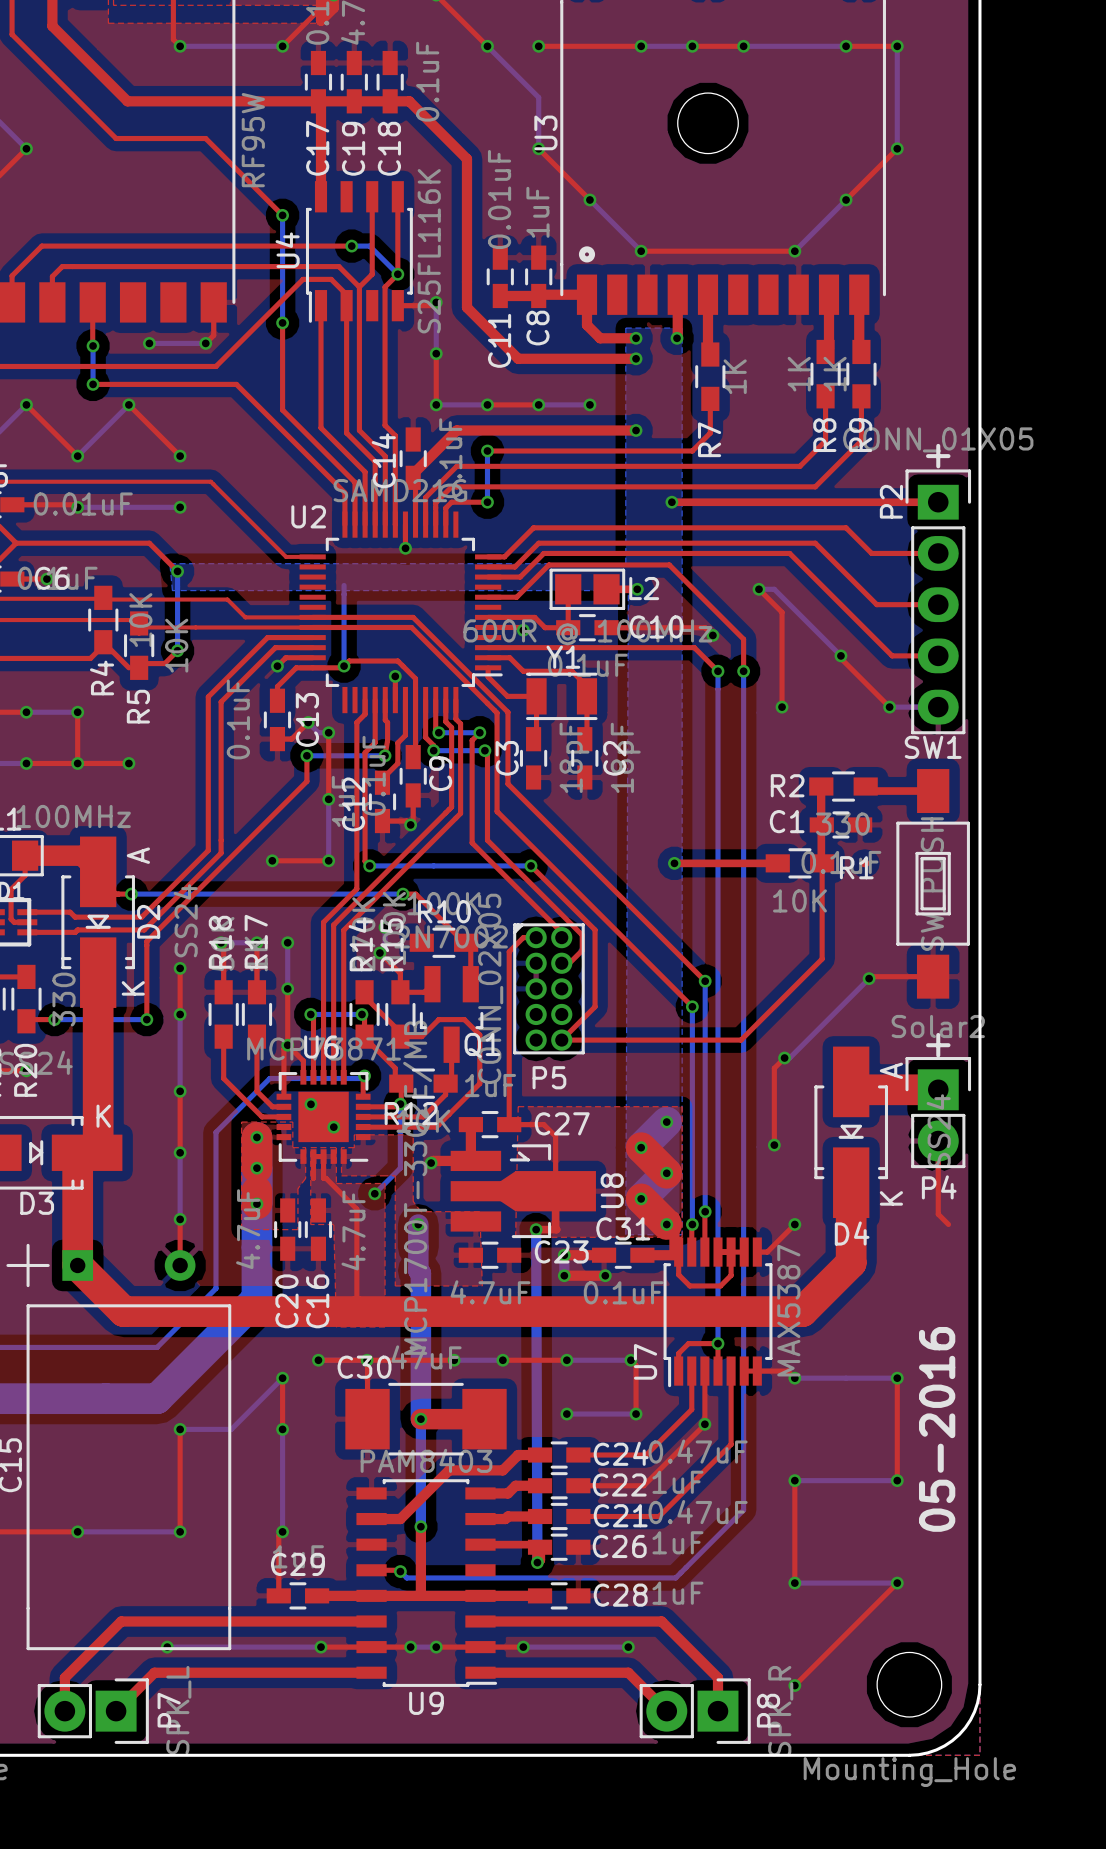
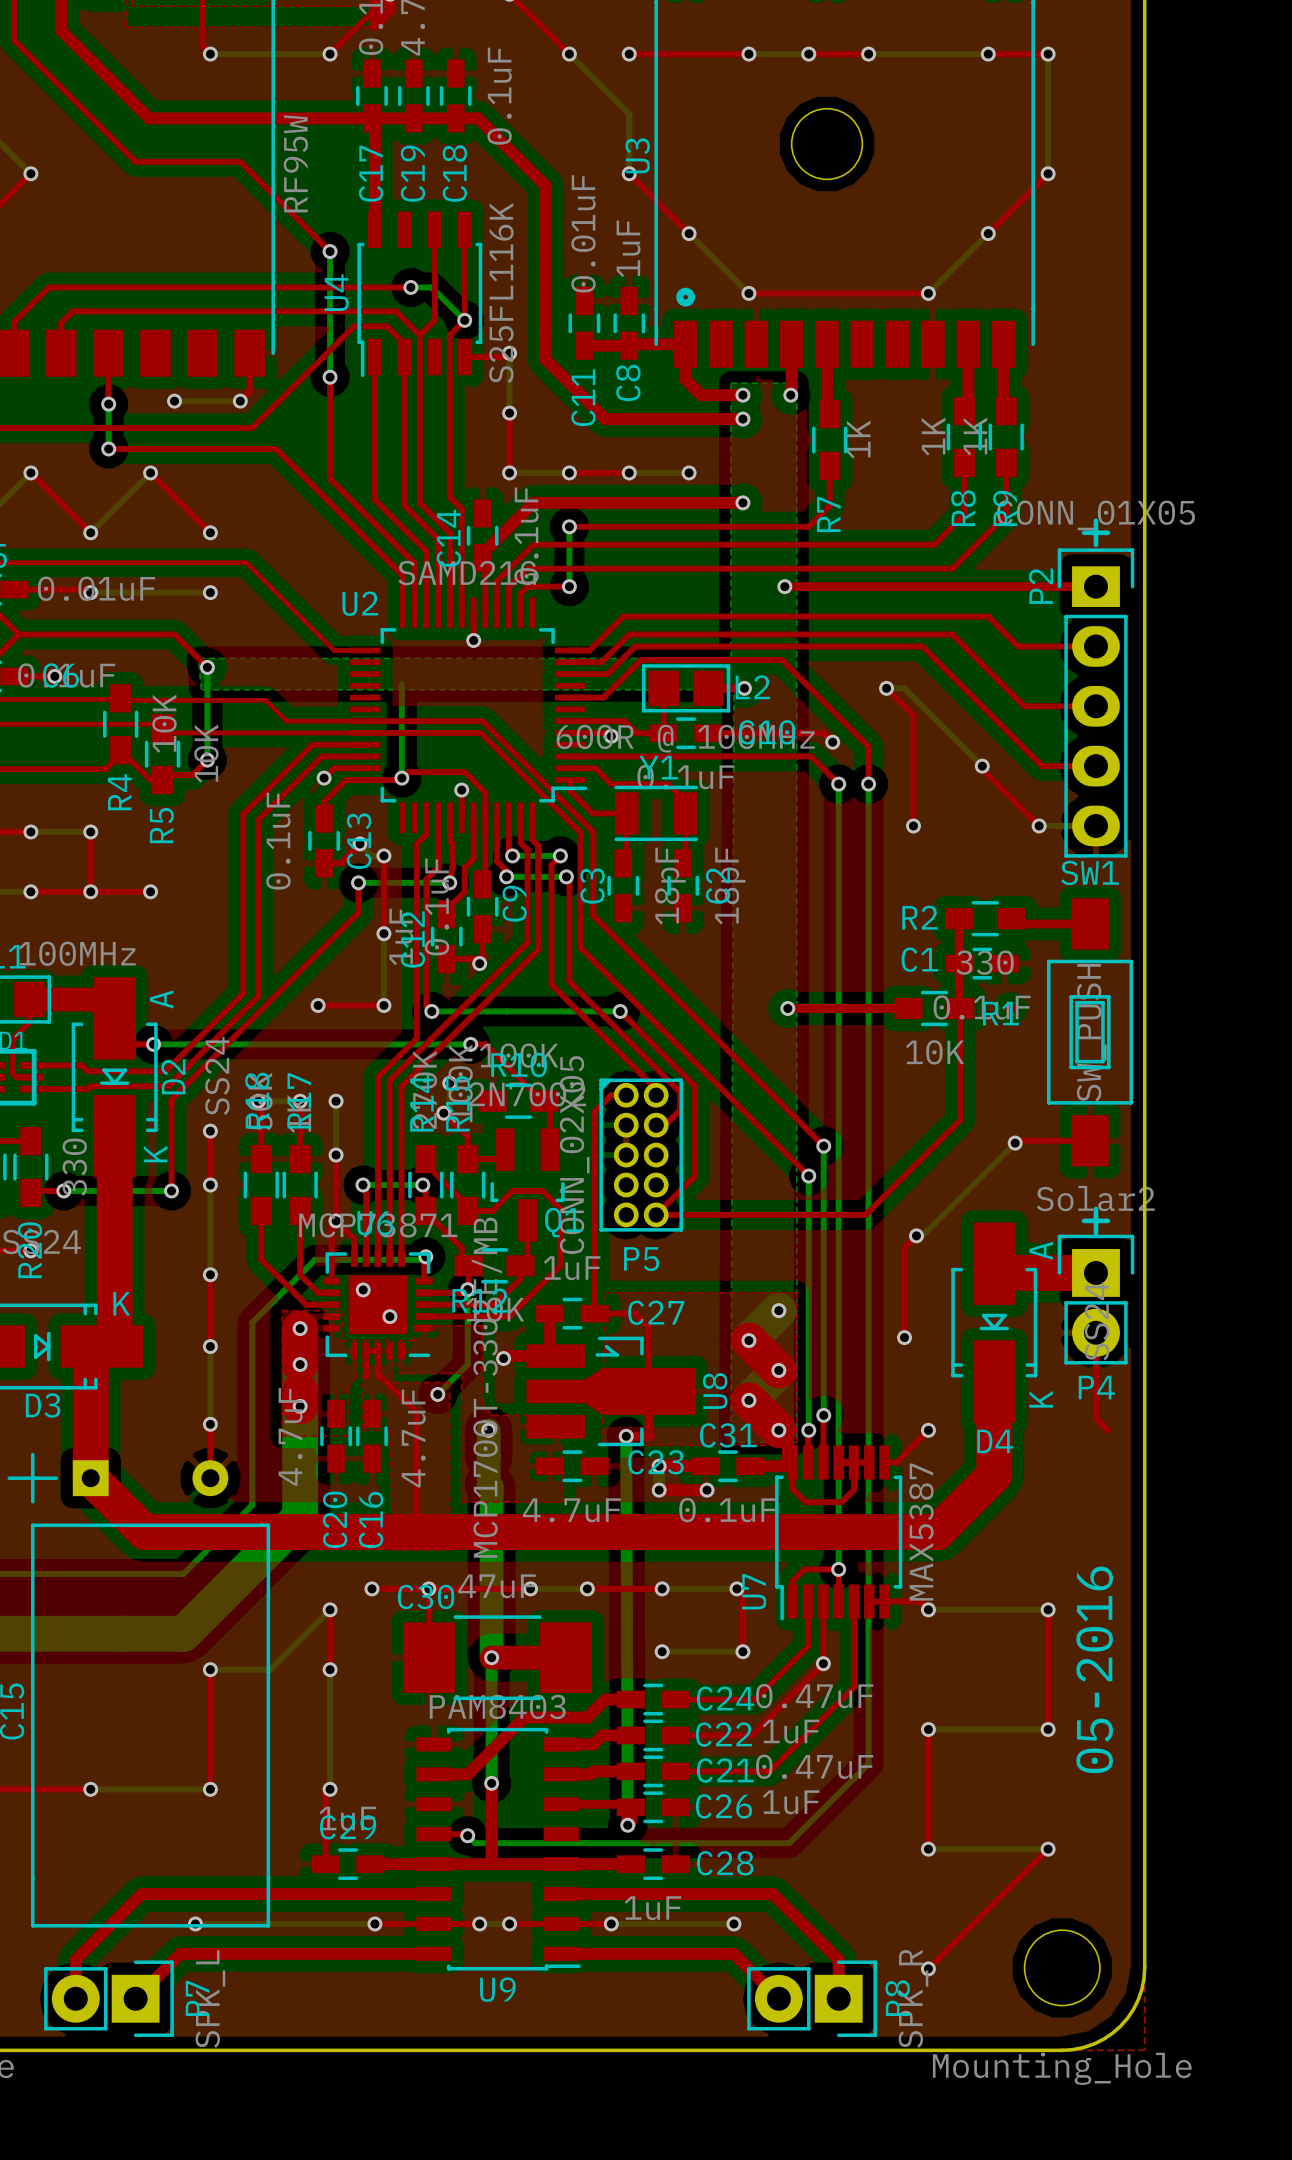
C28 value position: 1uF (677, 1593) -> 1uF (652, 1908)

